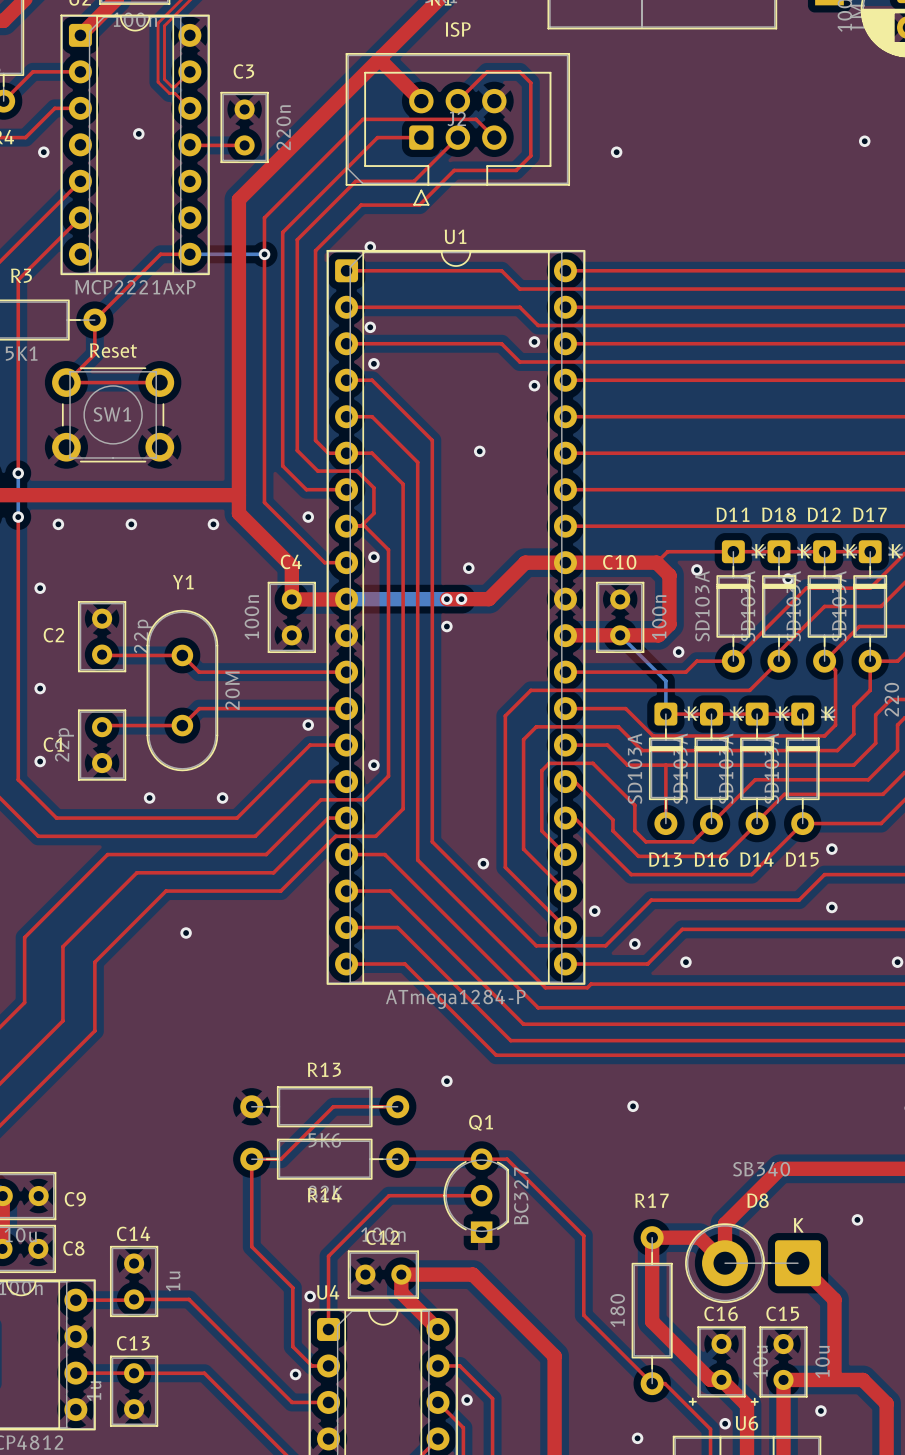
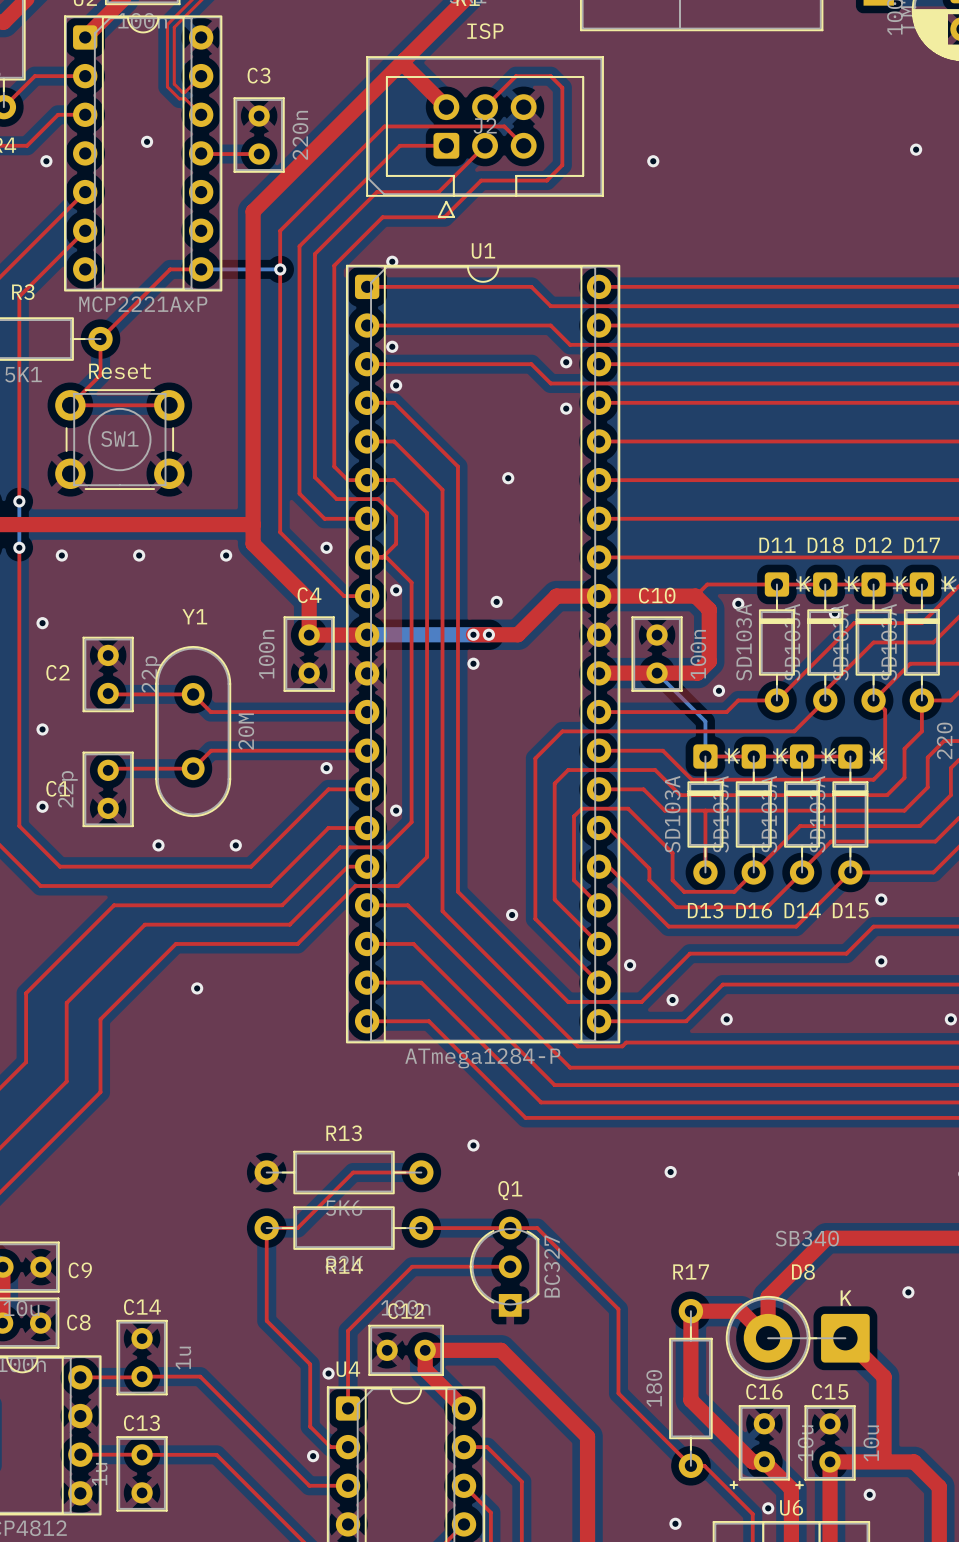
via: (467, 1400) -> none

